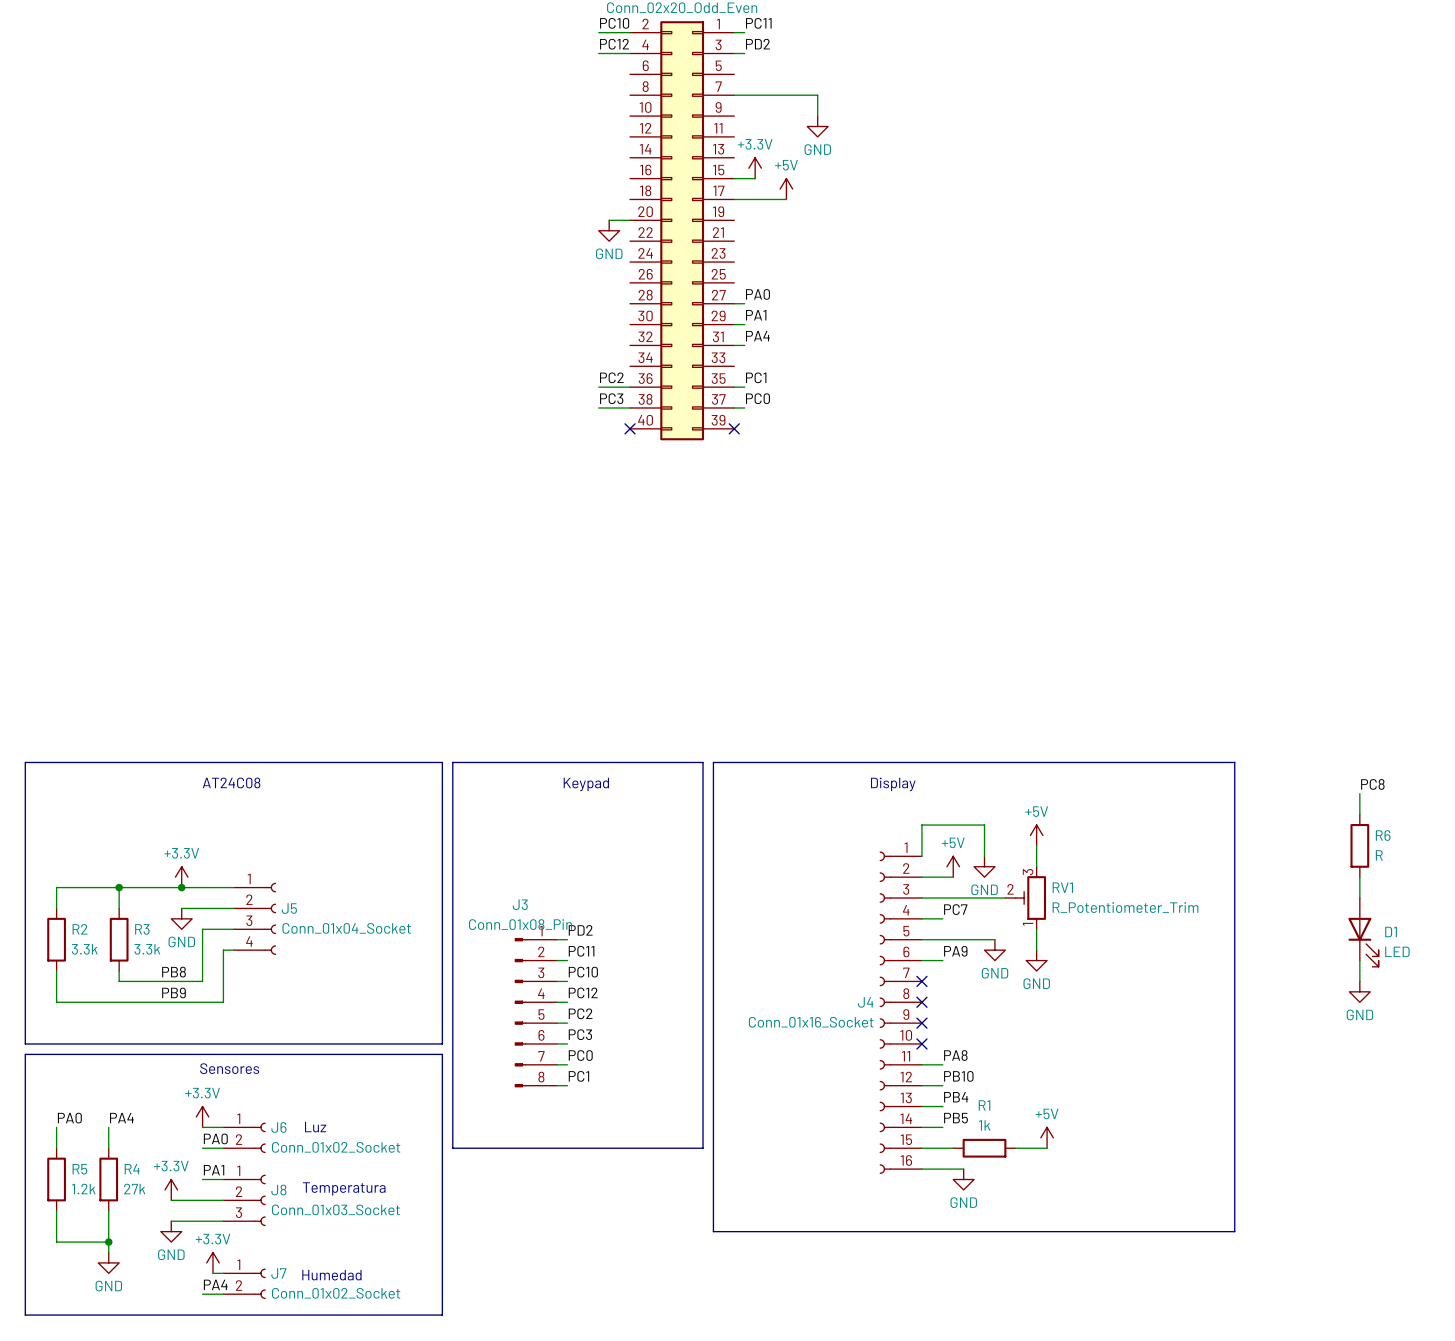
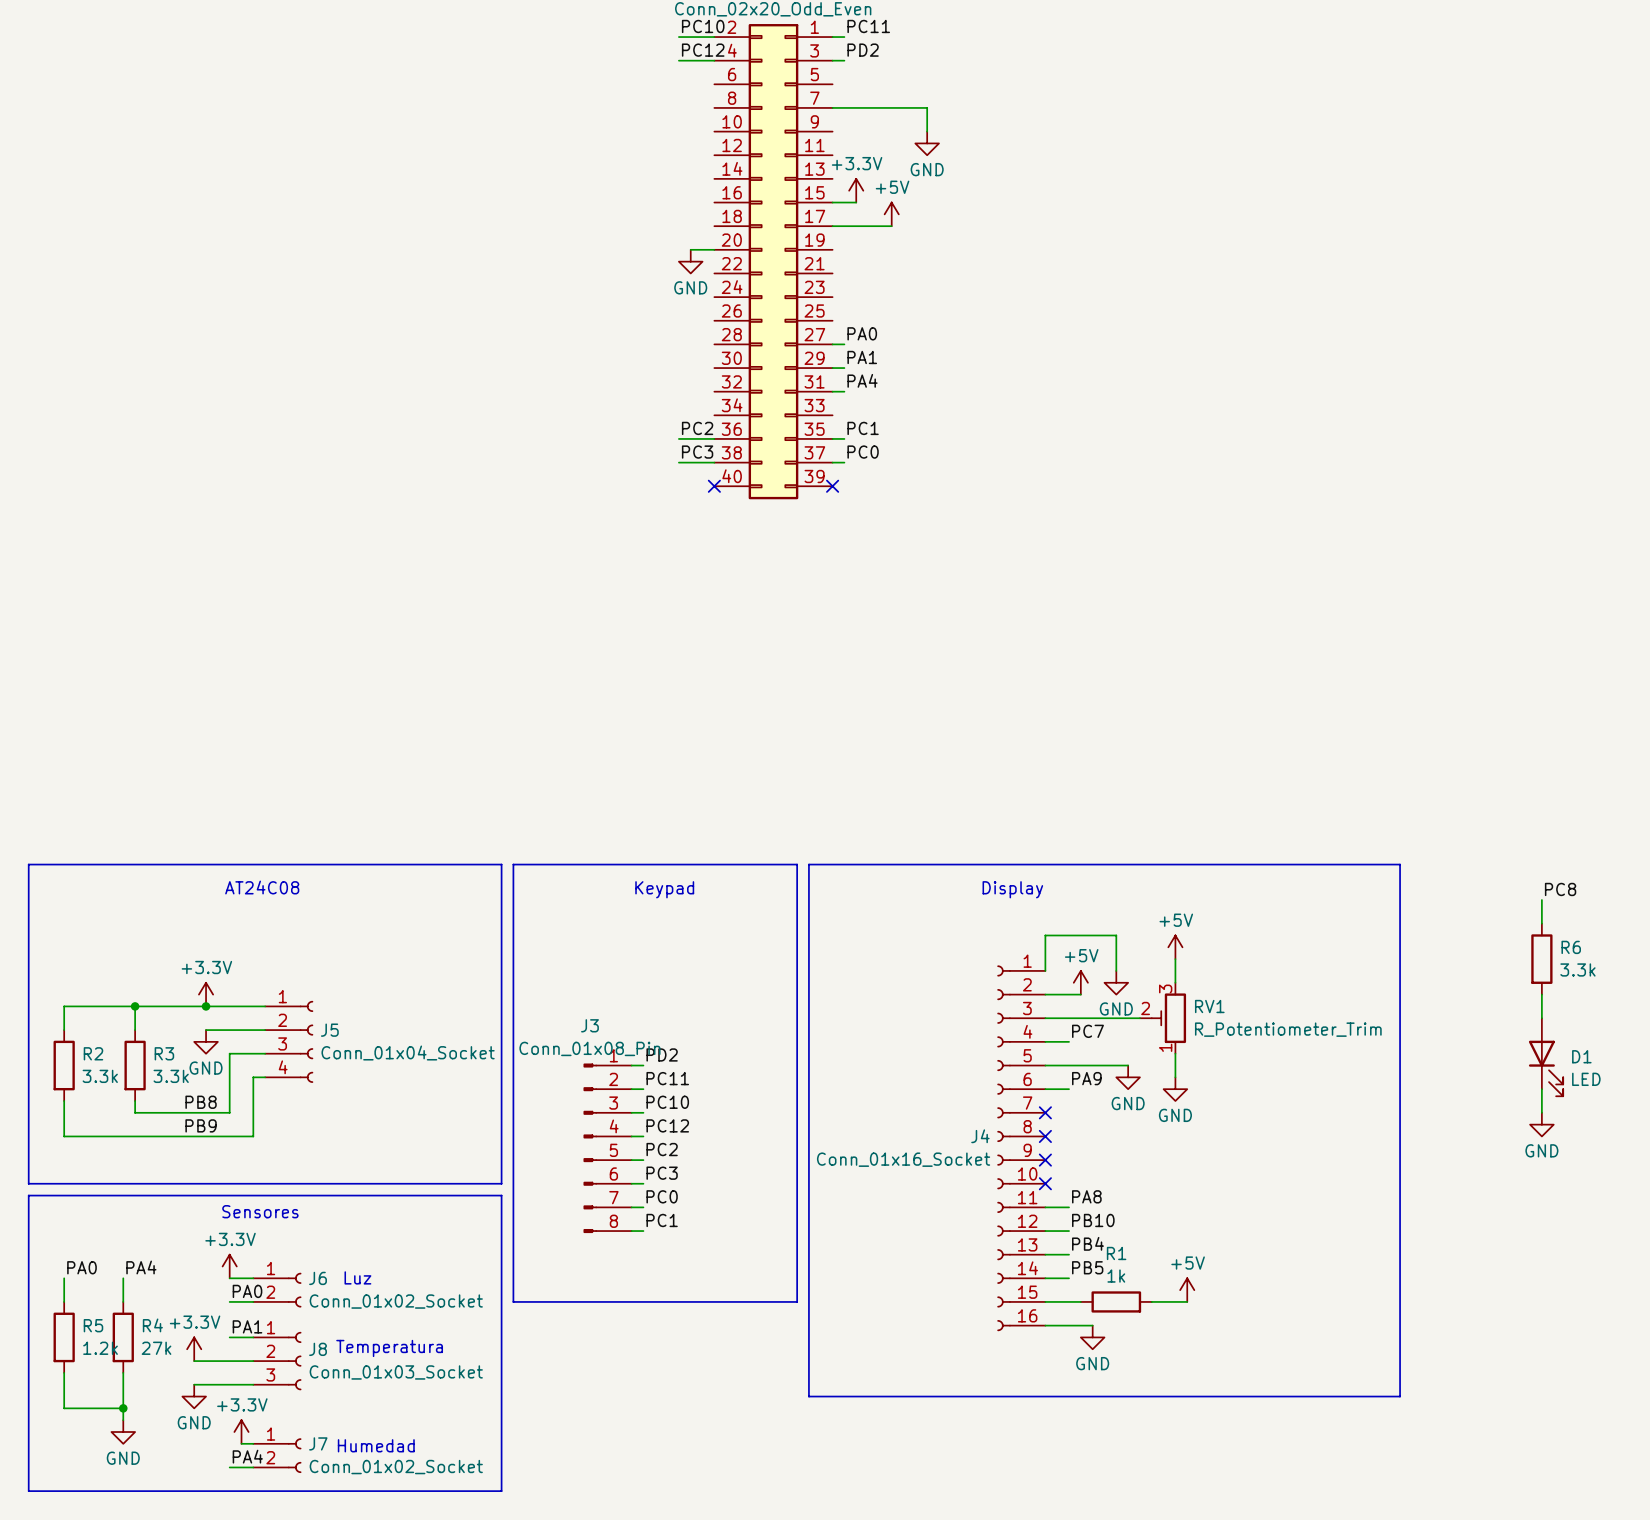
R6 value: R (1379, 855) -> 3.3k (1577, 969)

